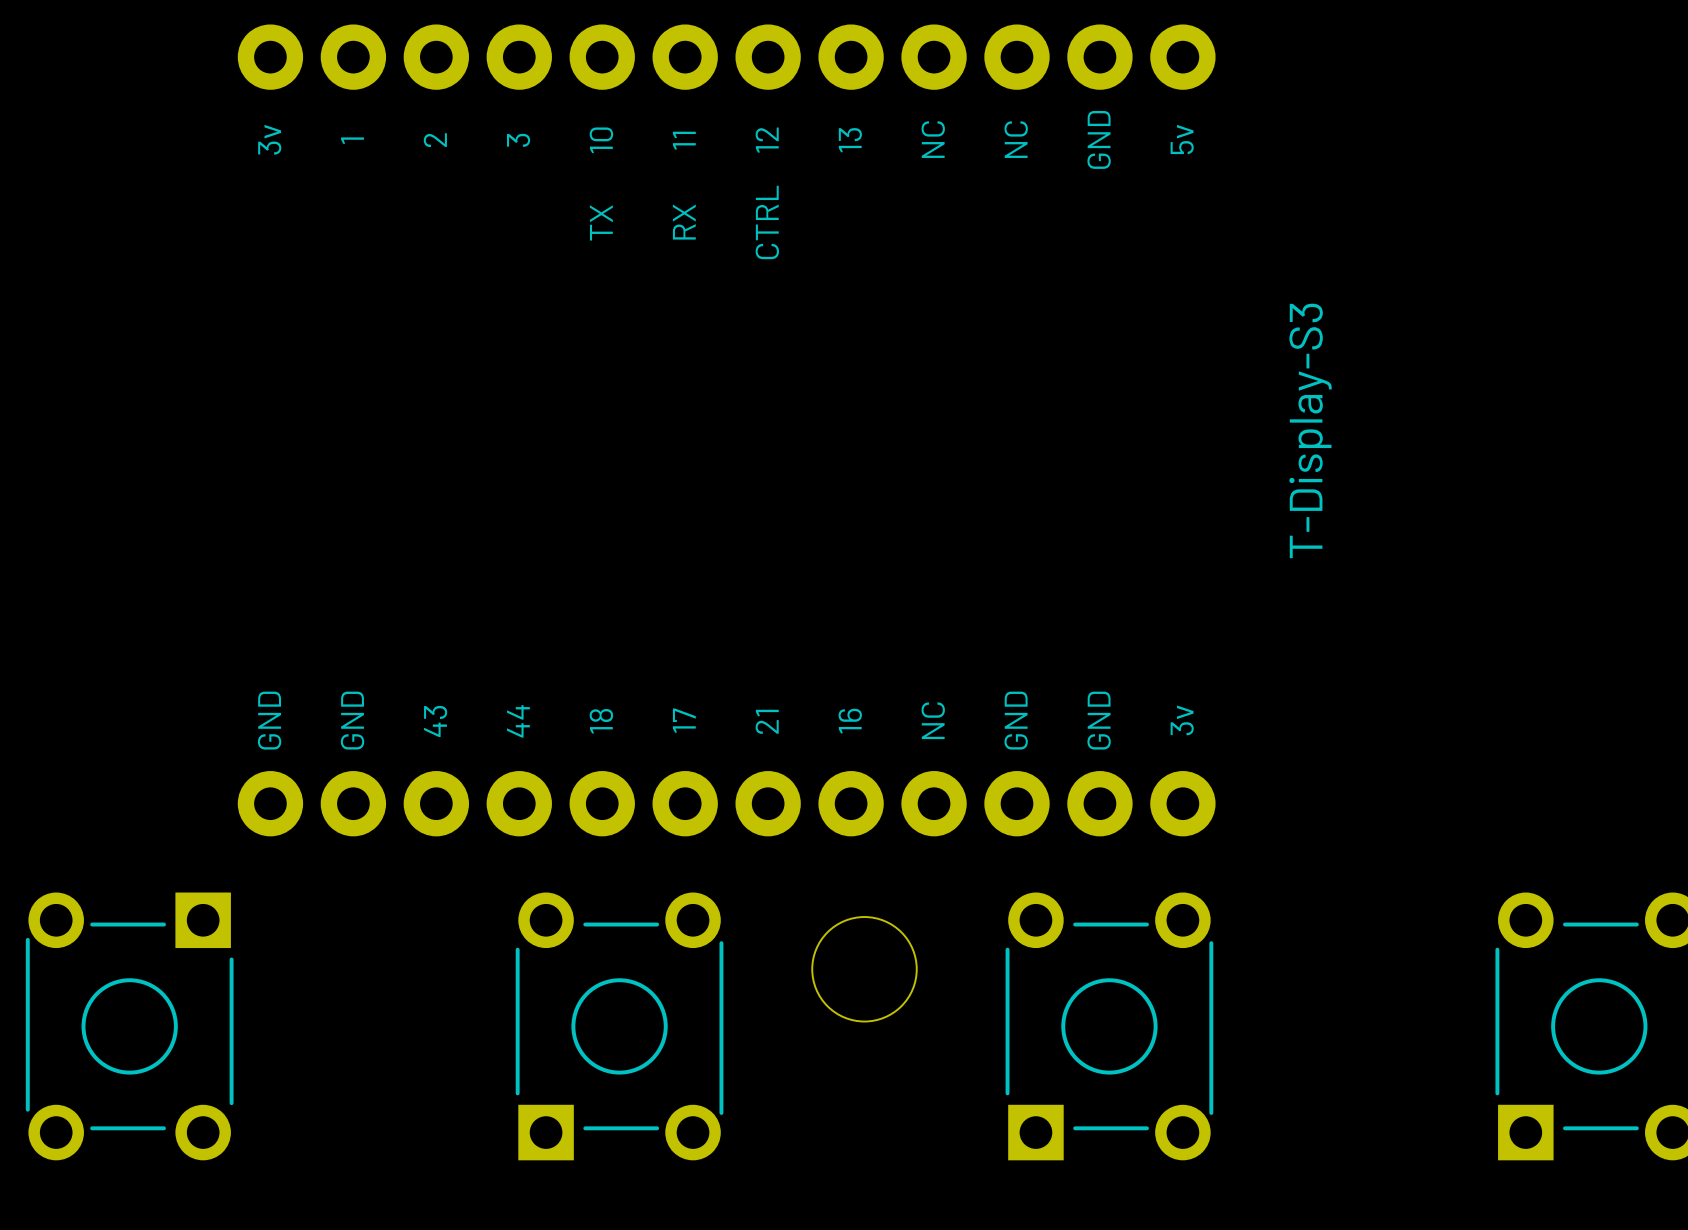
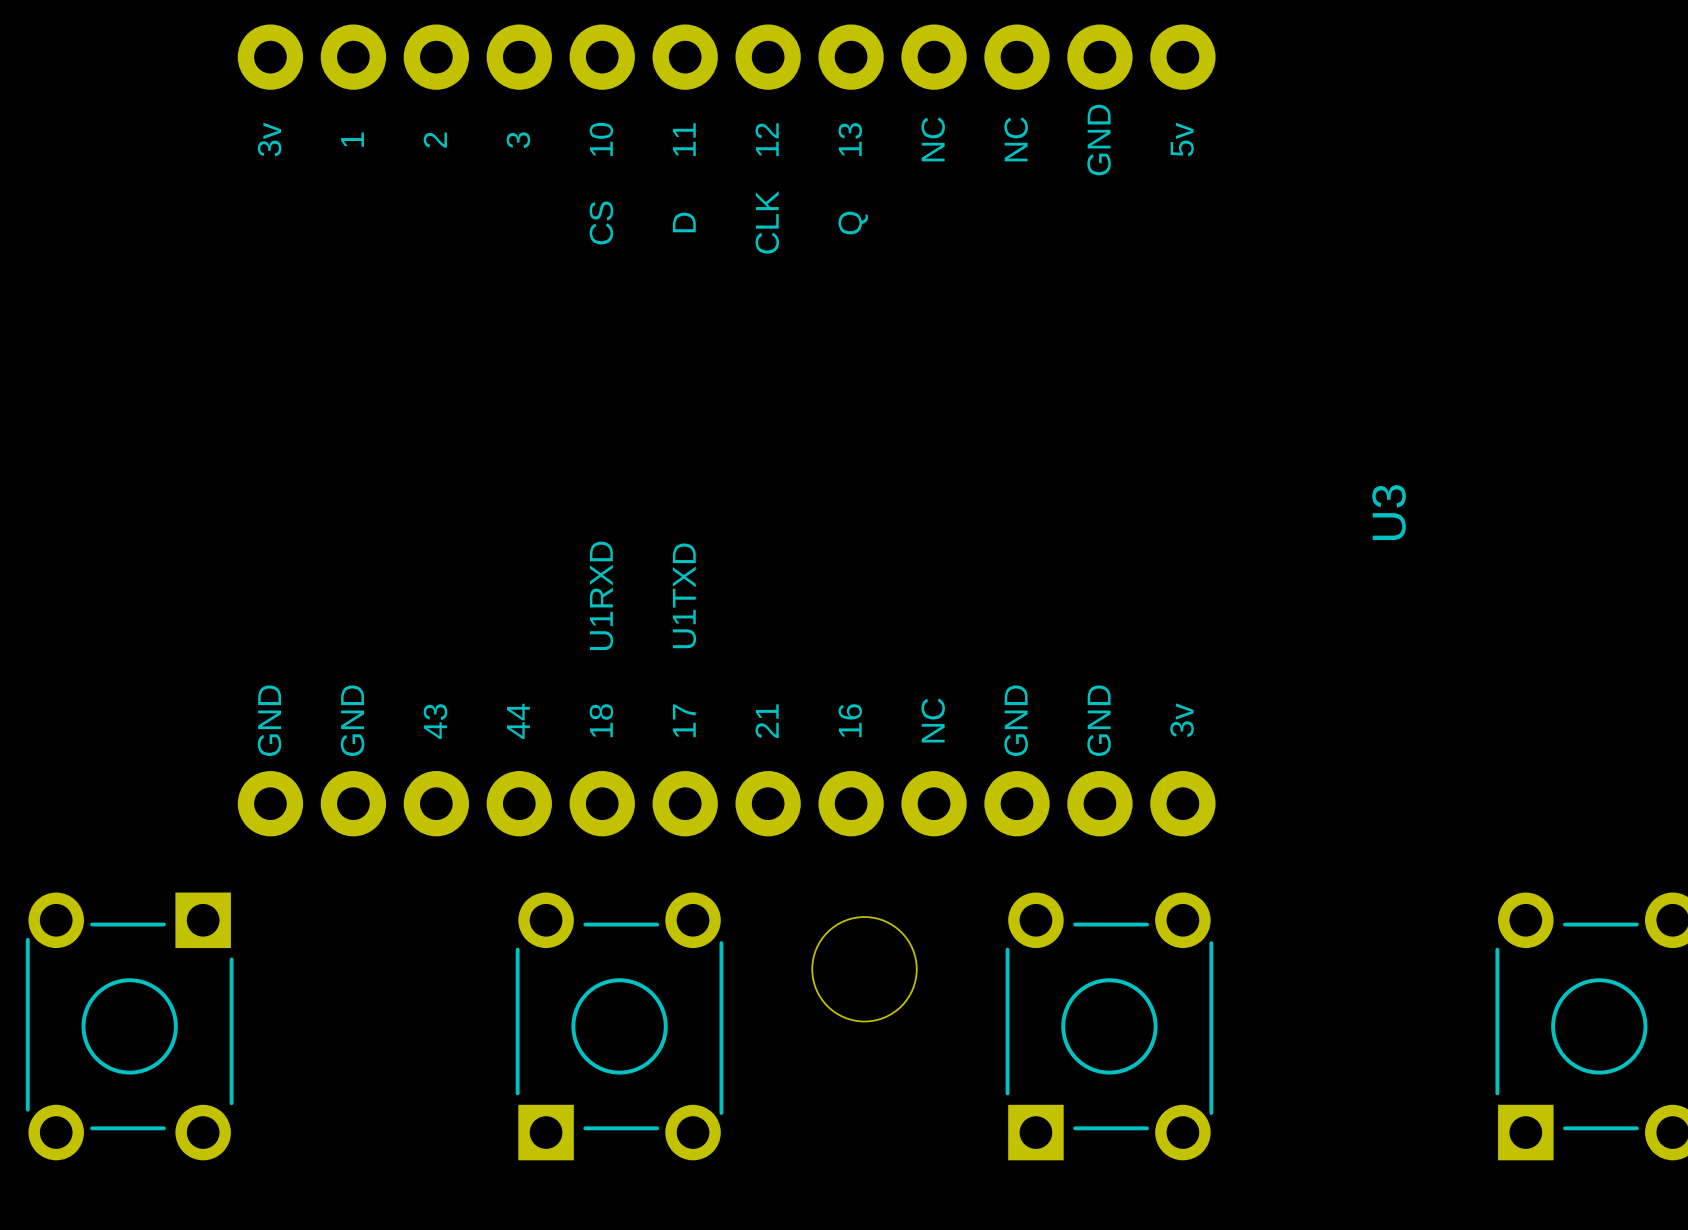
U3 text: TX (601, 222) -> CS (601, 222)
U3 text: RX (684, 222) -> D (684, 222)
U3 text: CTRL (767, 222) -> CLK (767, 222)
U3 text: none -> Q (853, 223)
U3 value: T-Display-S3 (1310, 430) -> none
U3 name: none -> U3 (1389, 512)
U3 text: none -> U1RXD (601, 595)
U3 text: none -> U1TXD (684, 595)

